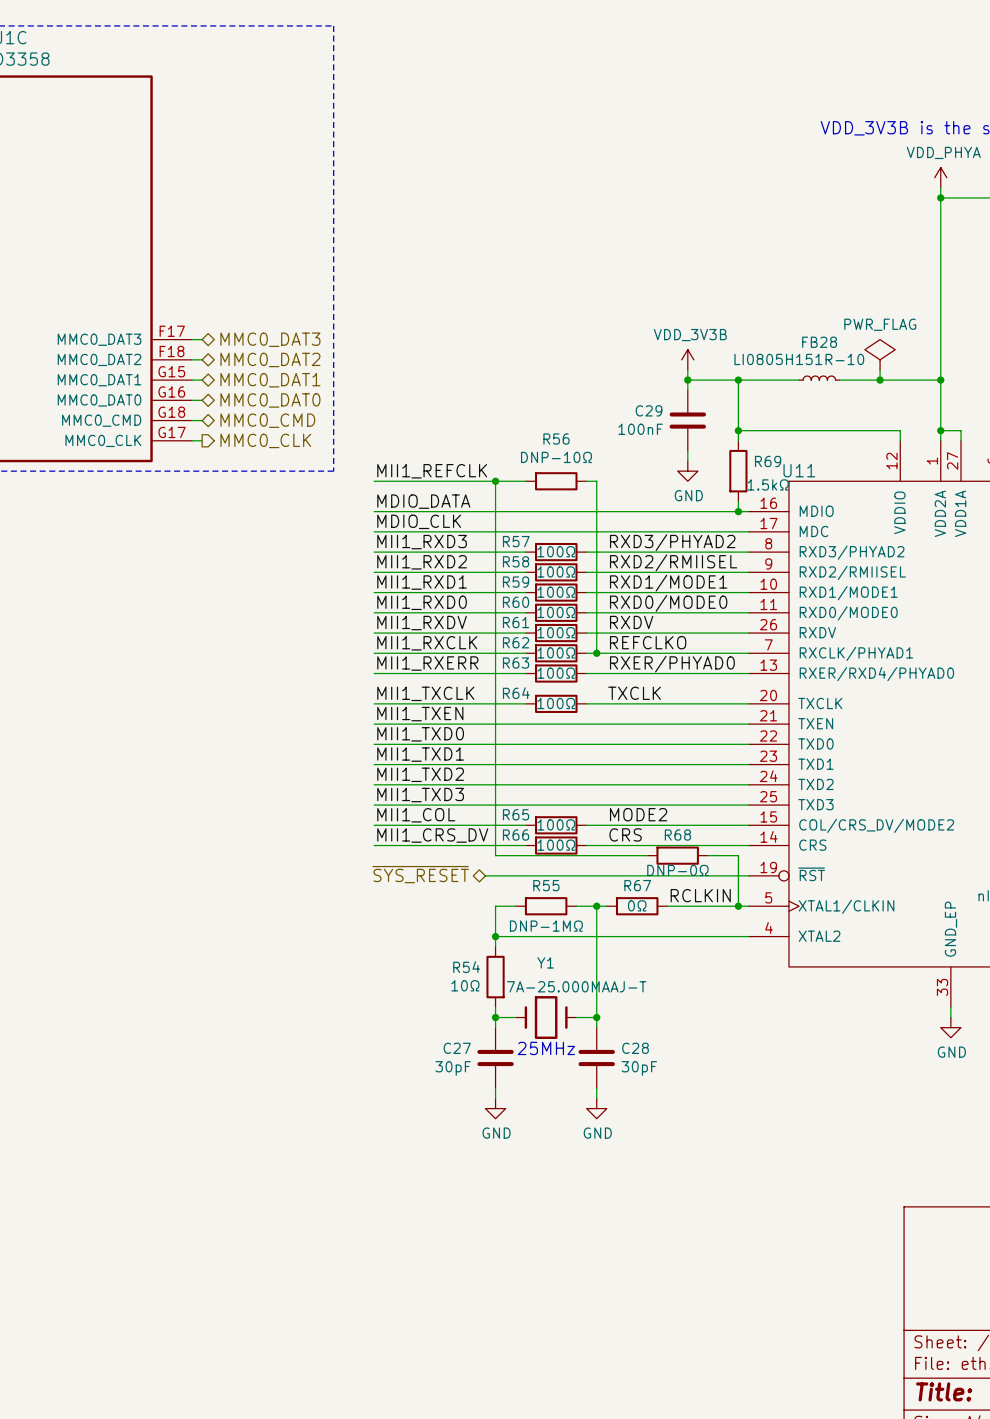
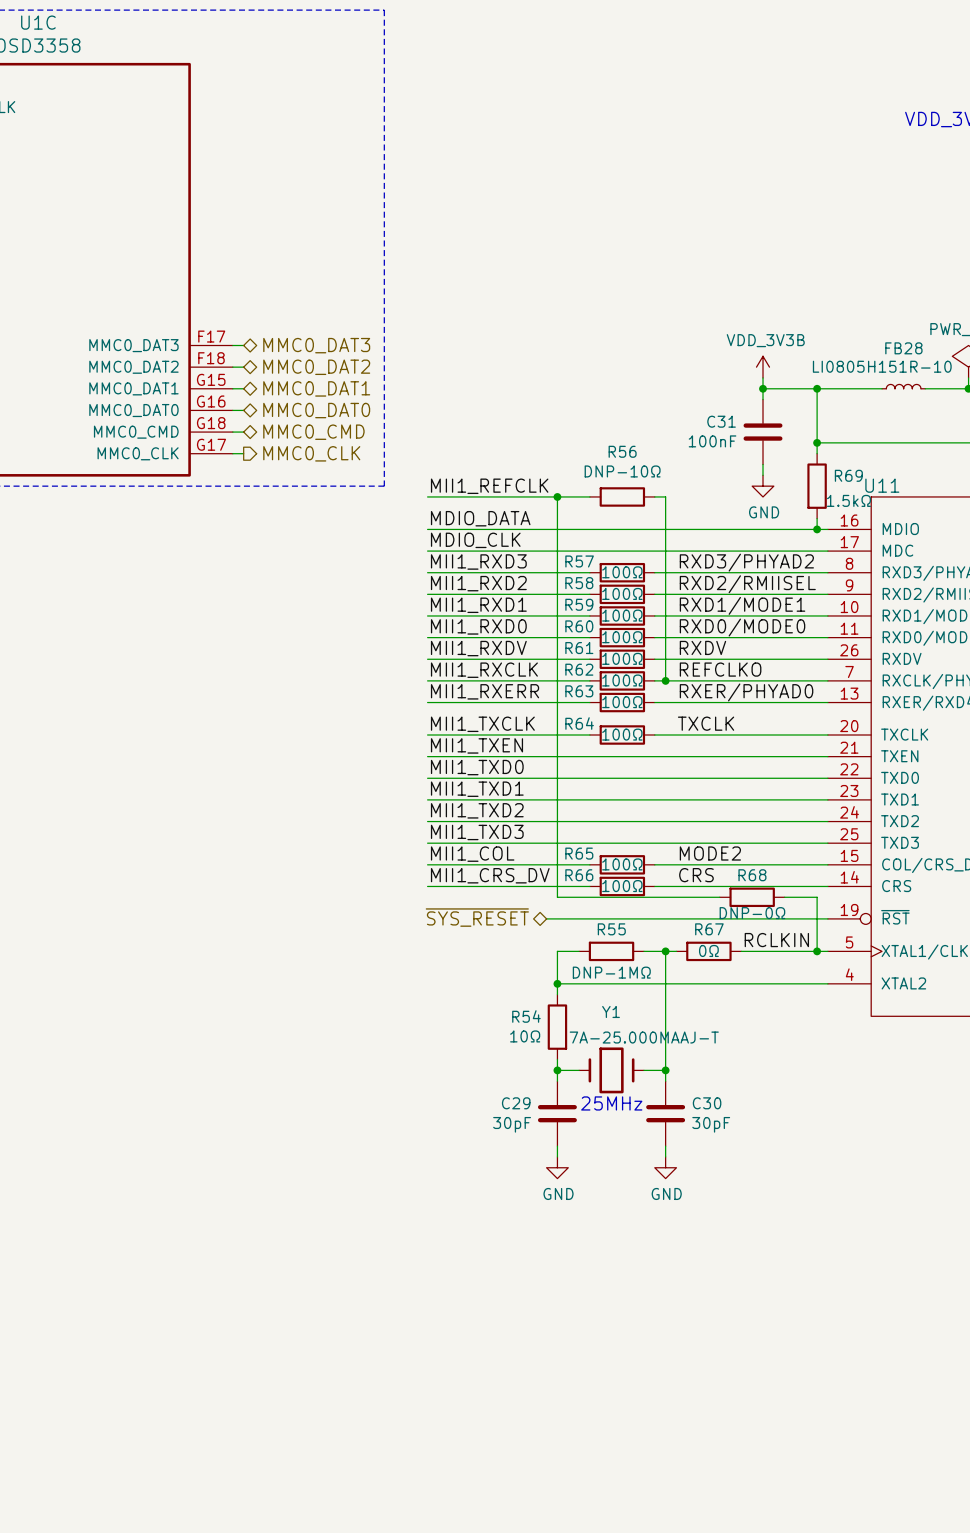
C29 name: C29 (649, 410) -> C31 (721, 421)
C27 name: C27 (457, 1048) -> C29 (516, 1103)
C28 name: C28 (635, 1048) -> C30 (707, 1103)

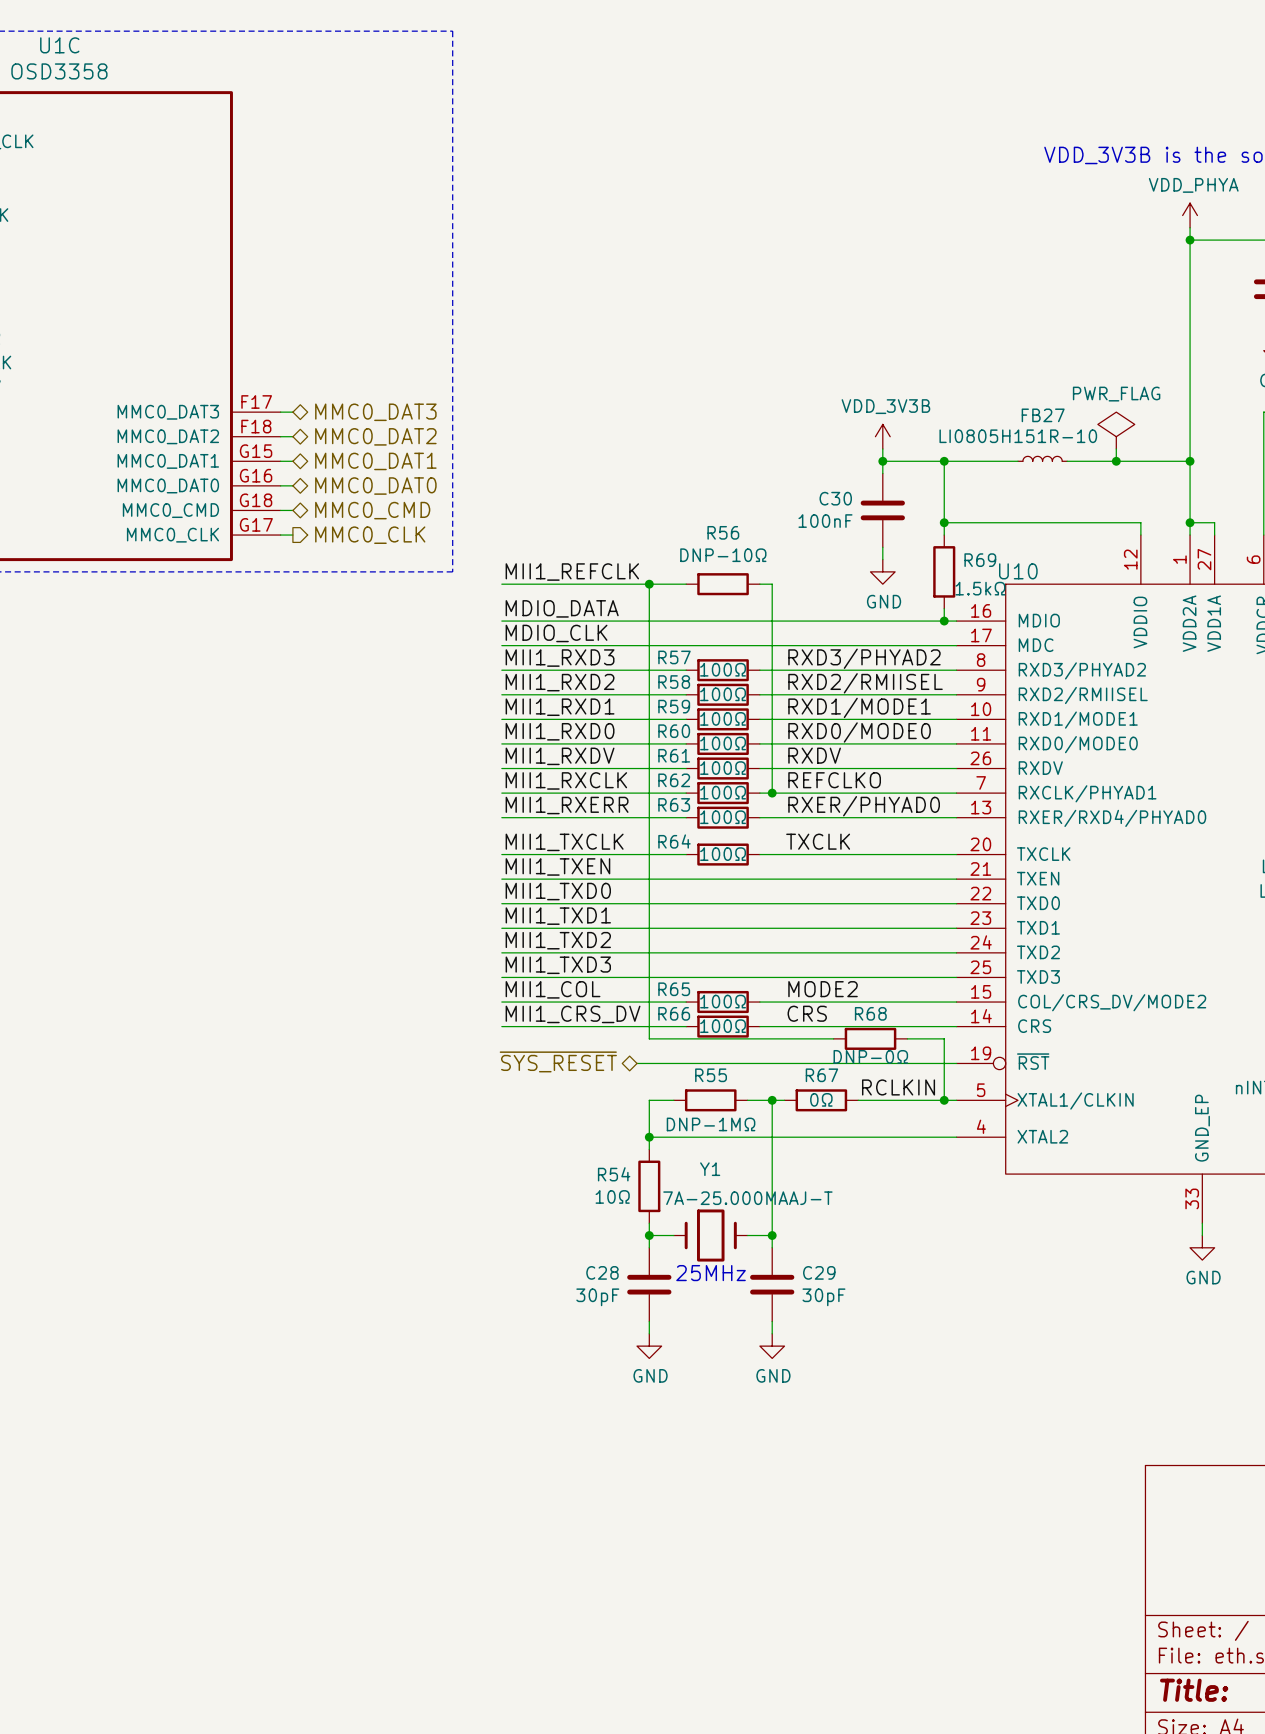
FB28 name: FB28 (903, 348) -> FB27 (1043, 415)
C31 name: C31 (721, 421) -> C30 (835, 498)
U11 name: U11 (882, 485) -> U10 (1018, 571)
C29 name: C29 (516, 1103) -> C28 (602, 1272)
C30 name: C30 (707, 1103) -> C29 (819, 1272)

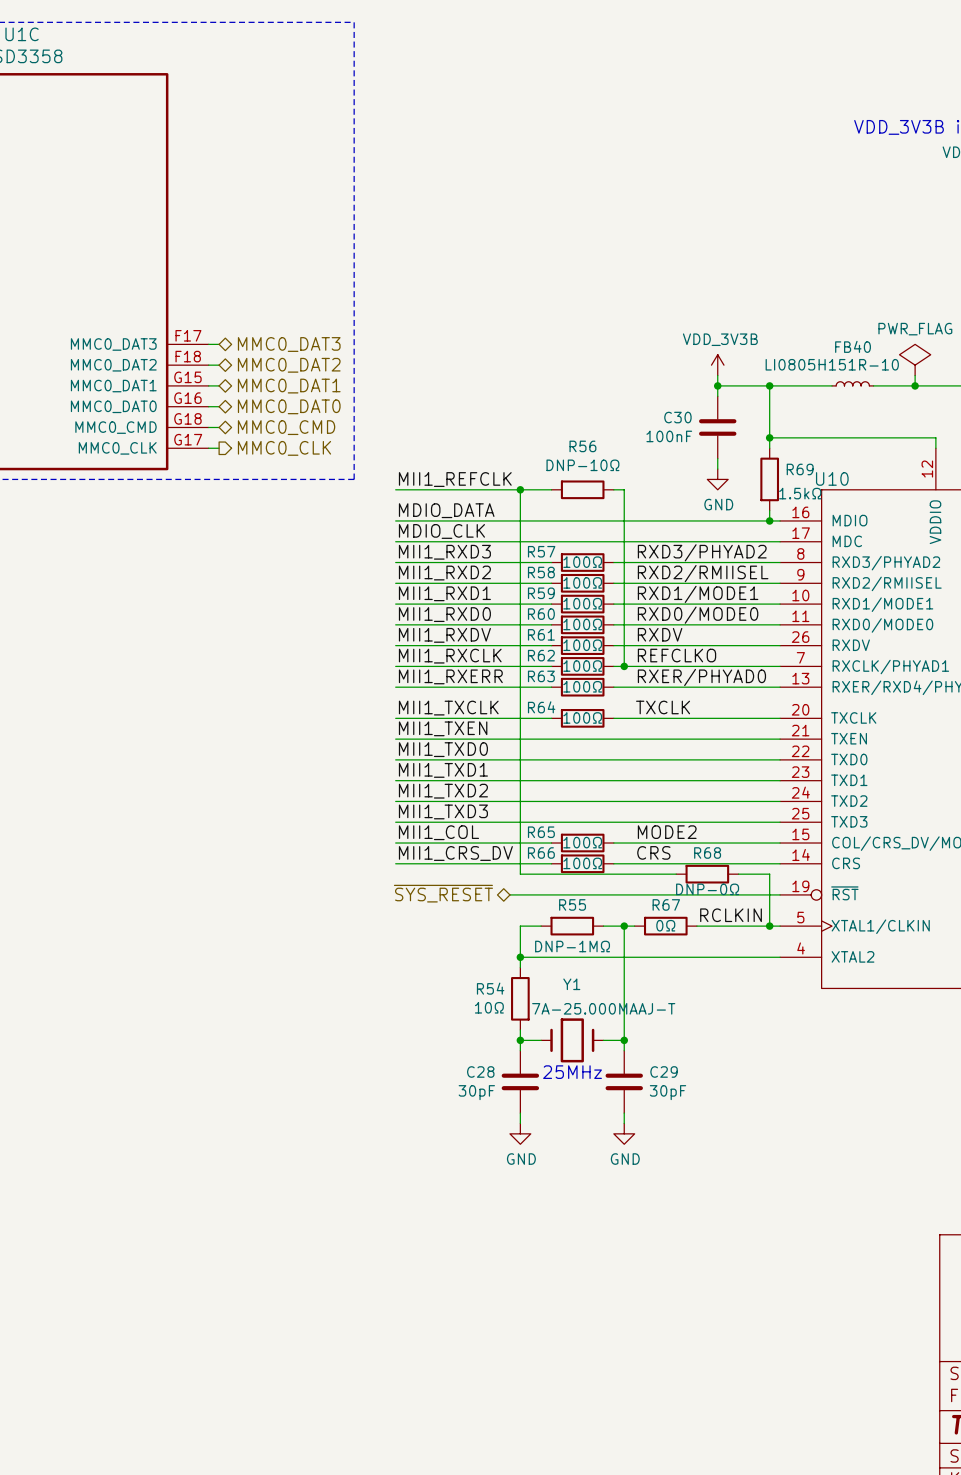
FB27 name: FB27 (1043, 415) -> FB40 (853, 346)

